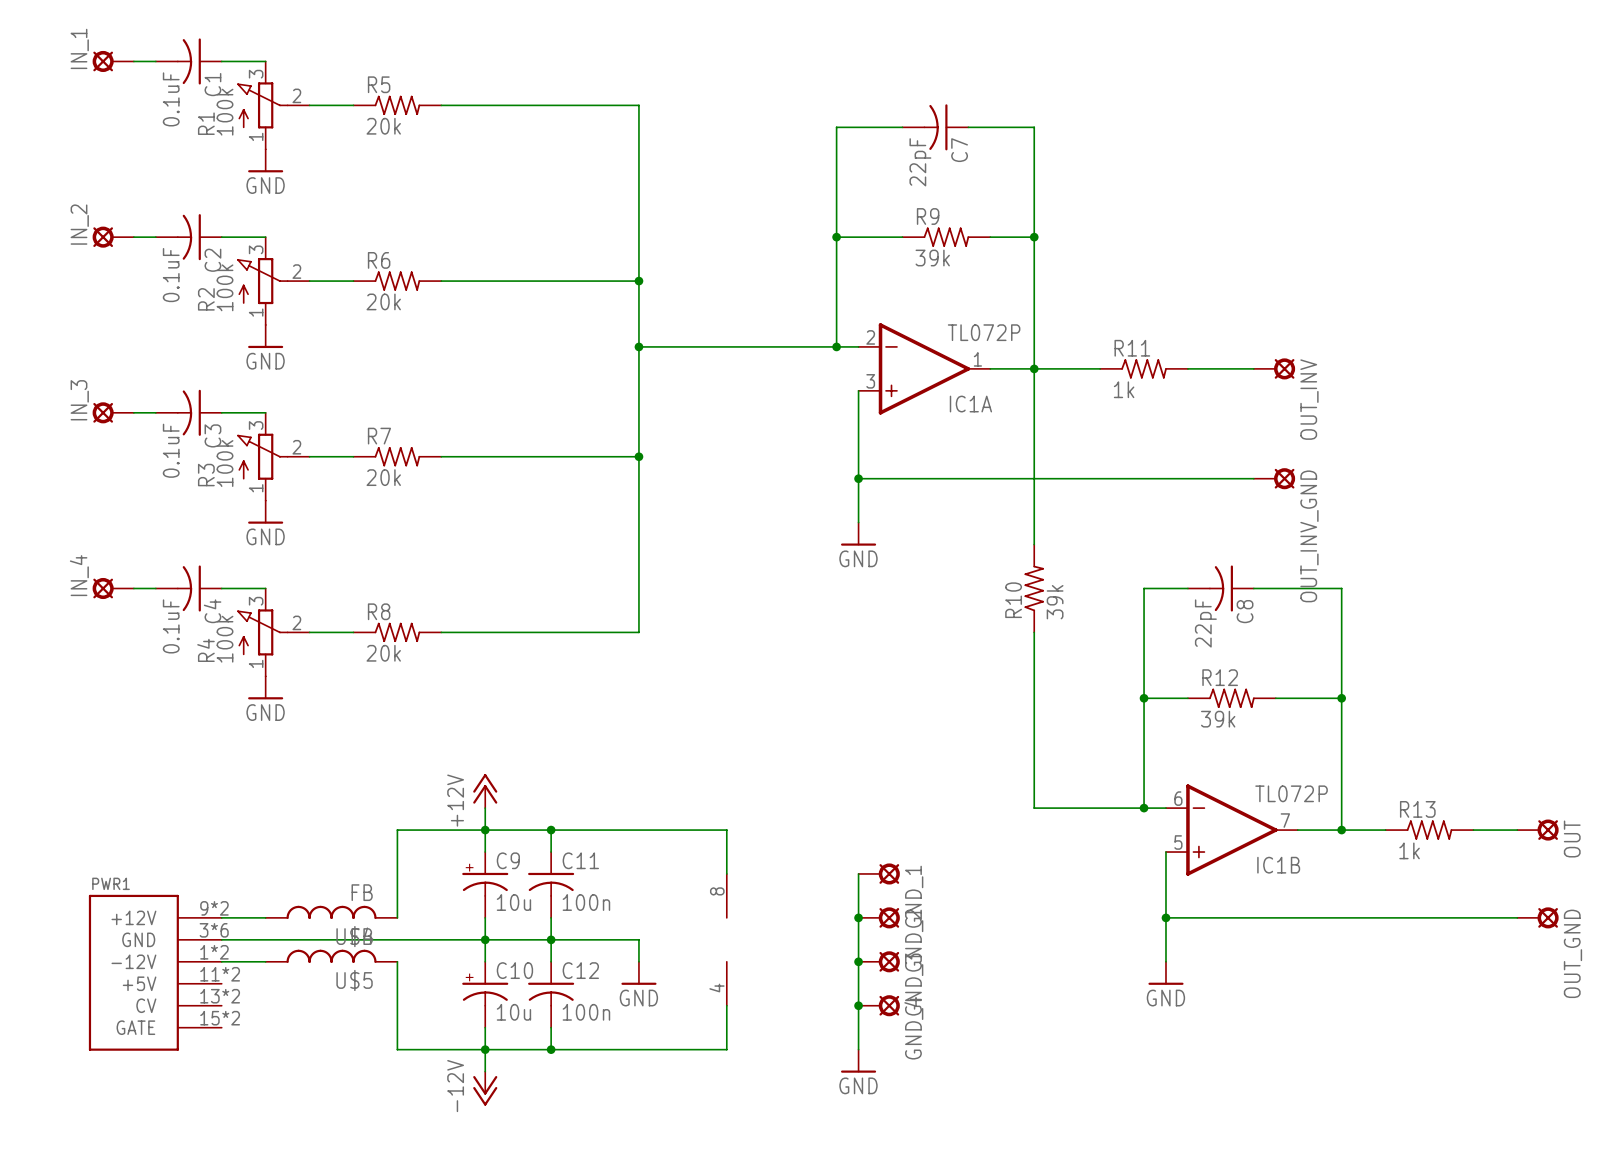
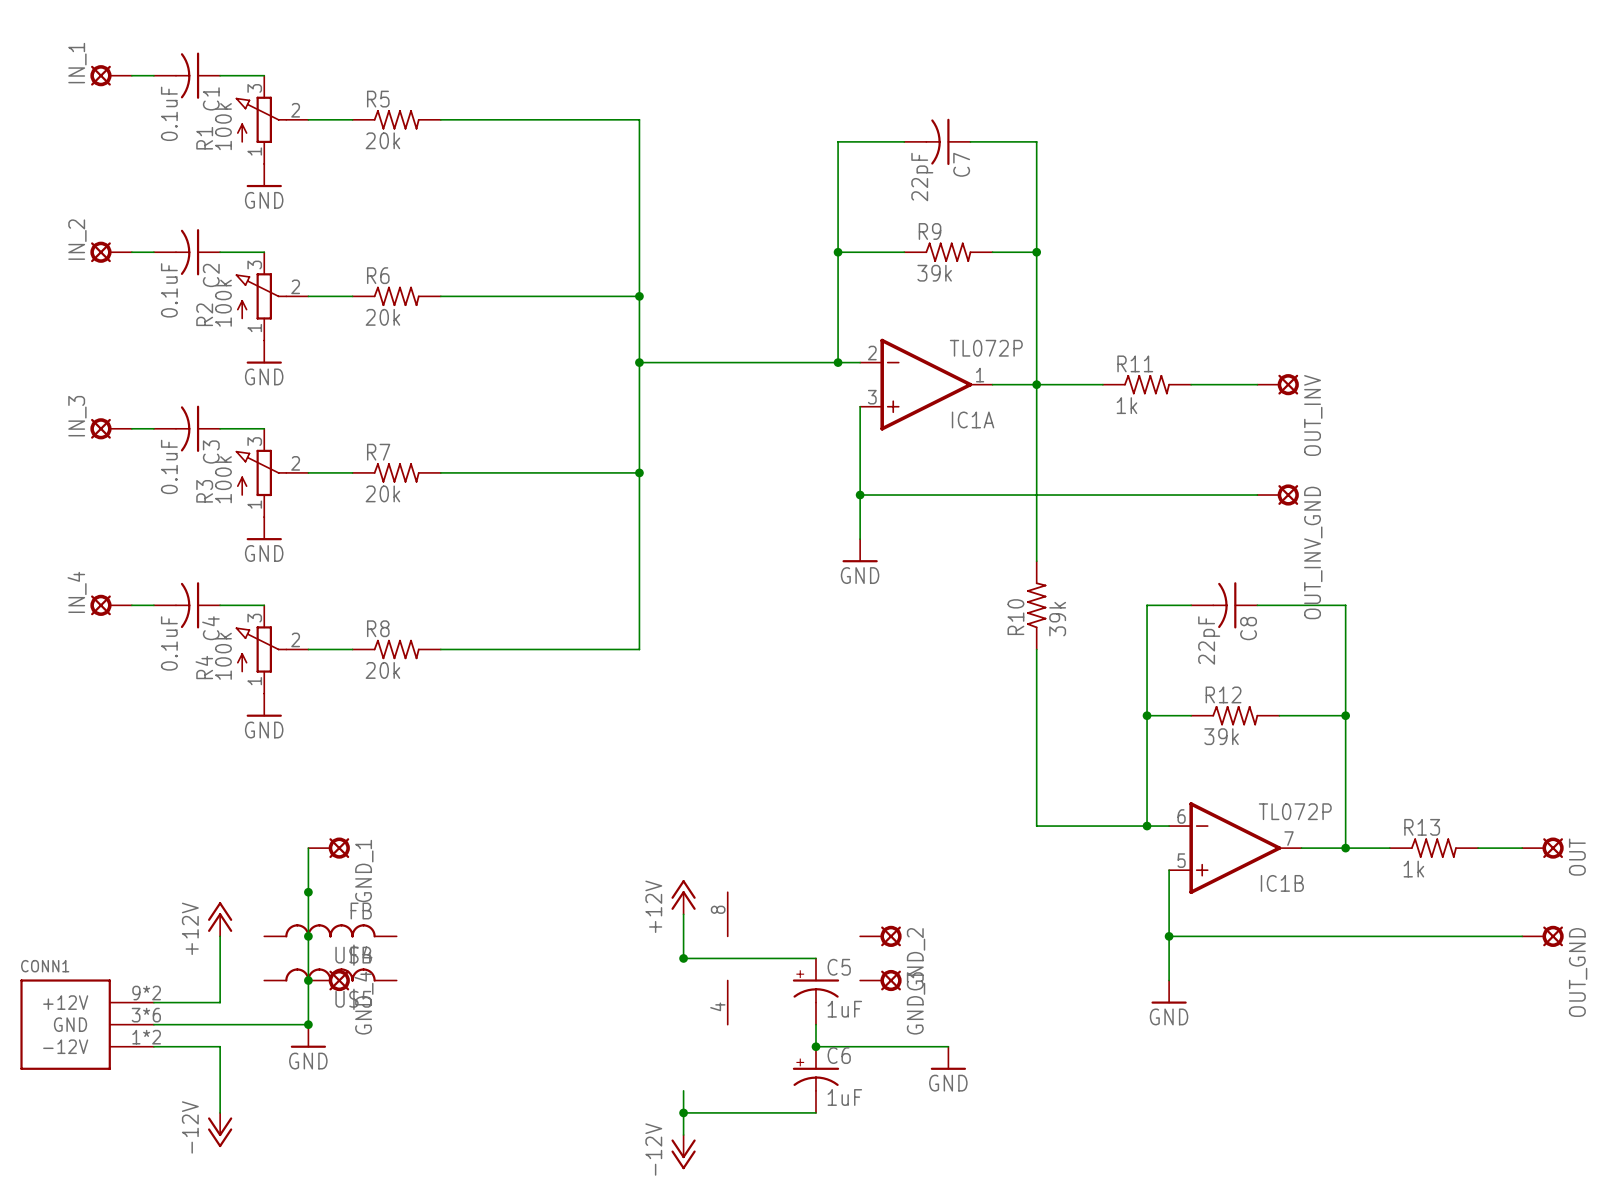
power symbol: +12V (485, 791) -> none
wire: (485, 808) (485, 852) -> none
wire: none -> (308, 848) (308, 1024) (153, 1024)
junction: (485, 830) -> none
wire: (551, 830) (551, 852) -> none
junction: (551, 830) -> none
junction: none -> (308, 892)
wire: (726, 873) (726, 830) (397, 830) (397, 917) -> none
wire: (858, 873) (858, 1049) -> none
GND_1 position: (879, 873) -> (329, 848)
power symbol: none -> +12V (683, 897)
C9: 10u (485, 884) -> none
C11: 100n (551, 884) -> none
wire: none -> (683, 914) (683, 958) (815, 958)
power symbol: none -> +12V (220, 919)
wire: (221, 917) (265, 917) -> (220, 936) (220, 1002) (153, 1002)
junction: none -> (308, 936)
wire: (485, 917) (485, 961) -> none
wire: (551, 917) (551, 961) -> none
junction: (858, 917) -> none
wire: (221, 939) (638, 939) (638, 961) -> none
junction: (485, 939) -> none
junction: (551, 939) -> none
junction: none -> (683, 958)
wire: (221, 961) (265, 961) -> none
junction: none -> (308, 980)
wire: (397, 961) (397, 1049) (726, 1049) (726, 1005) -> none
junction: (858, 961) -> none
PWR1: (155, 972) -> none
C5: none -> 1uF (815, 991)
power symbol: GND (638, 973) -> none
C10: 10u (485, 994) -> none
C12: 100n (551, 994) -> none
CONN1: none -> (87, 1024)
junction: none -> (308, 1024)
wire: none -> (815, 1024) (815, 1046) (948, 1046)
junction: (858, 1005) -> none
GND_4 position: (879, 1005) -> (329, 980)
power symbol: none -> GND (308, 1036)
wire: none -> (153, 1046) (220, 1046) (220, 1112)
wire: (485, 1027) (485, 1071) -> (683, 1090) (683, 1135)
wire: (551, 1027) (551, 1049) -> none
junction: none -> (815, 1046)
junction: (485, 1049) -> none
junction: (551, 1049) -> none
C6: none -> 1uF (815, 1079)
power symbol position: GND (858, 1061) -> GND (948, 1058)
power symbol: -12V (485, 1088) -> none
wire: none -> (683, 1112) (815, 1112)
junction: none -> (683, 1112)
power symbol: none -> -12V (220, 1130)
power symbol: none -> -12V (683, 1152)

